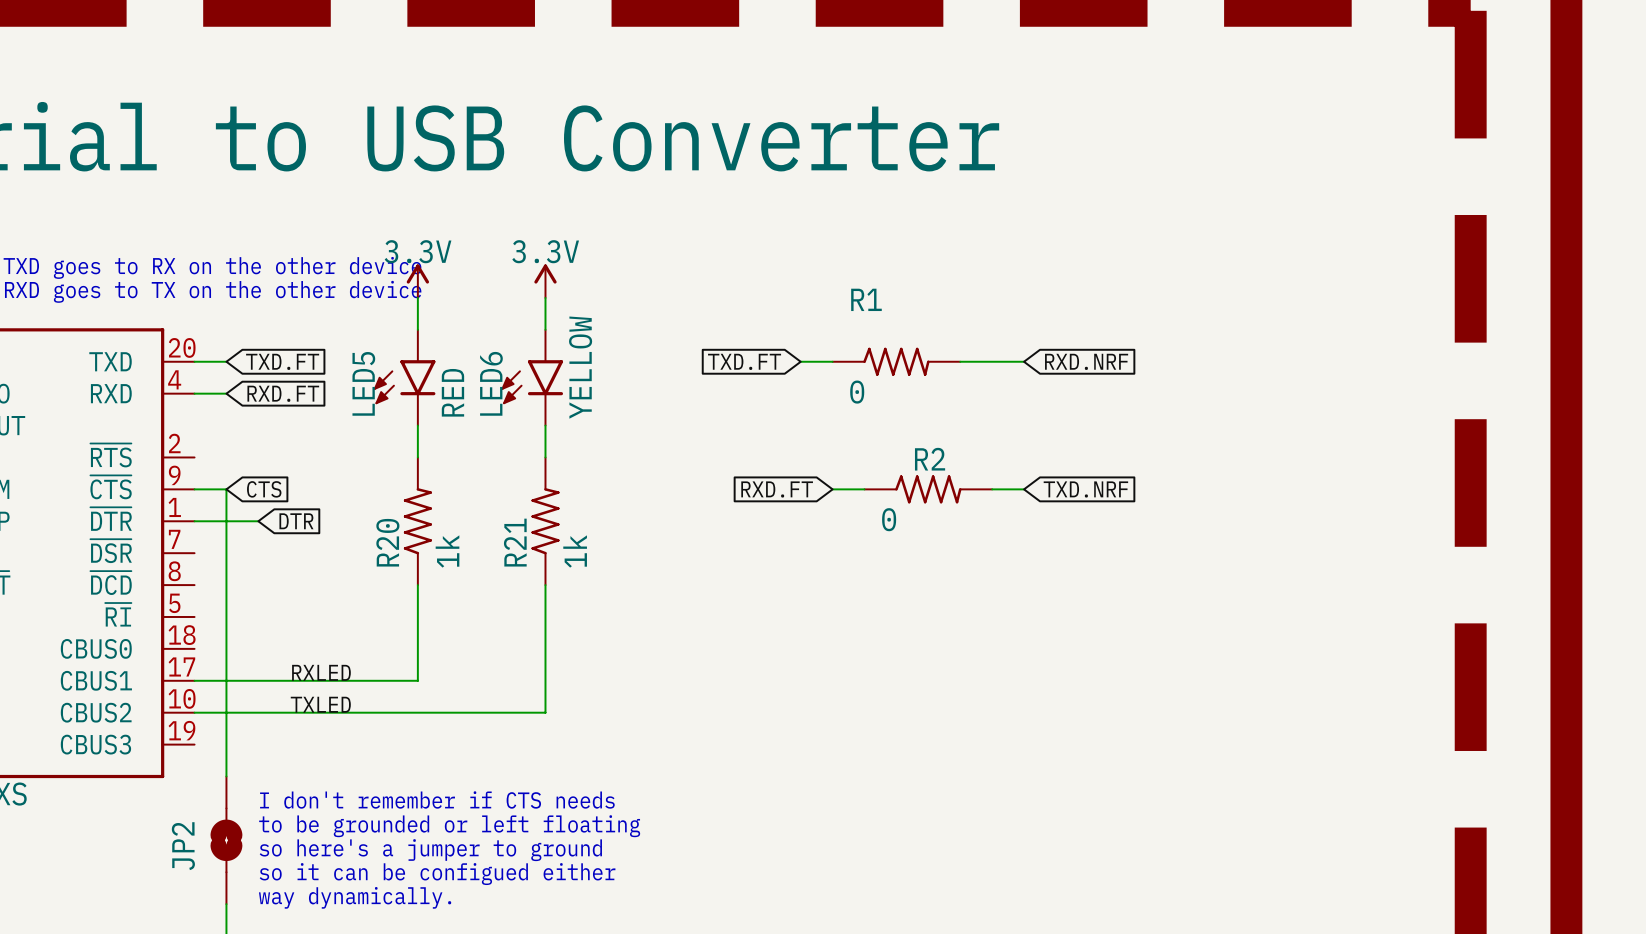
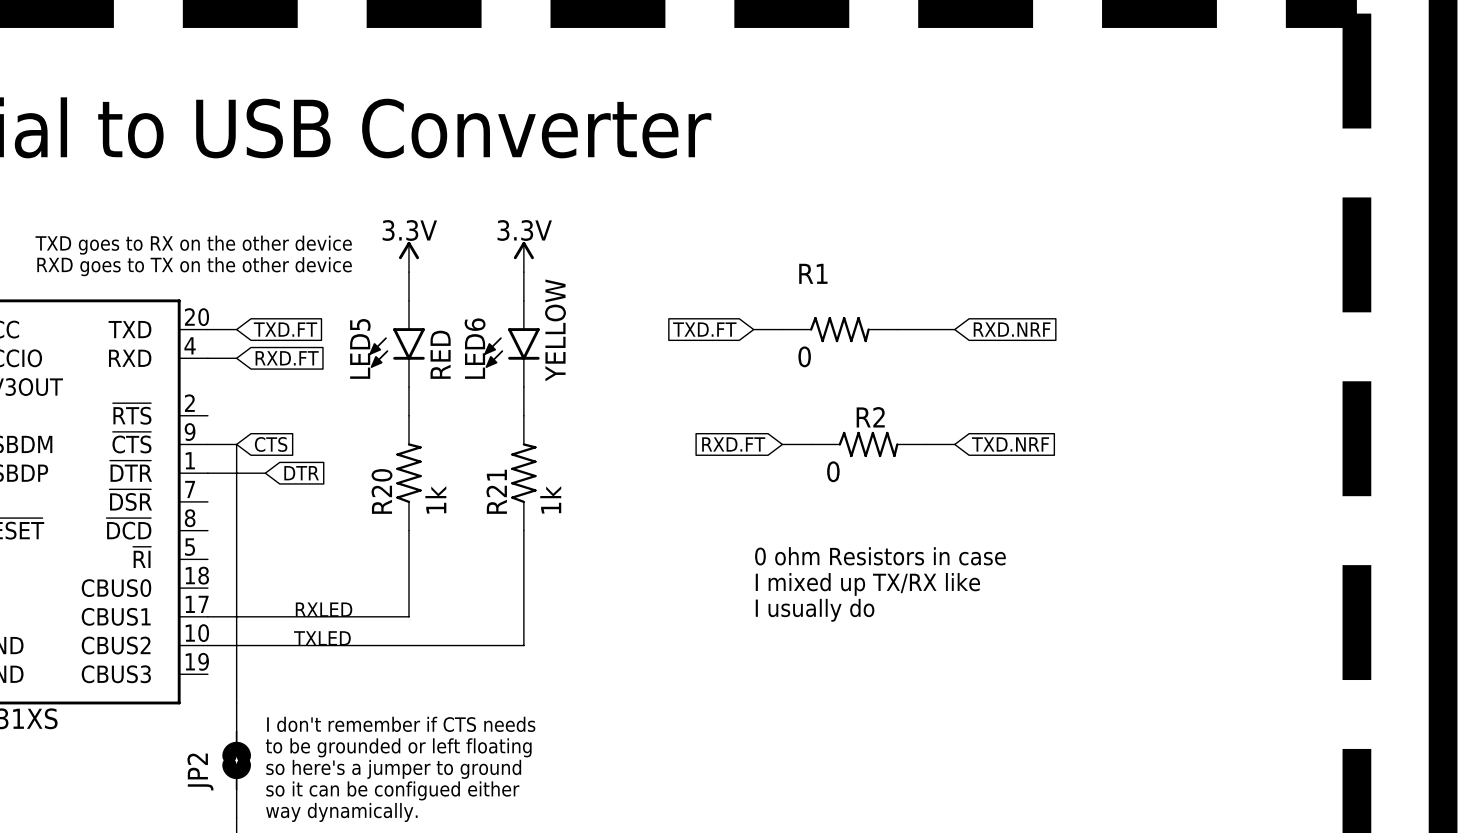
text: none -> 0 ohm Resistors in case (880, 556)
text: none -> I mixed up TX/RX like (867, 584)
text: none -> I usually do (815, 610)

